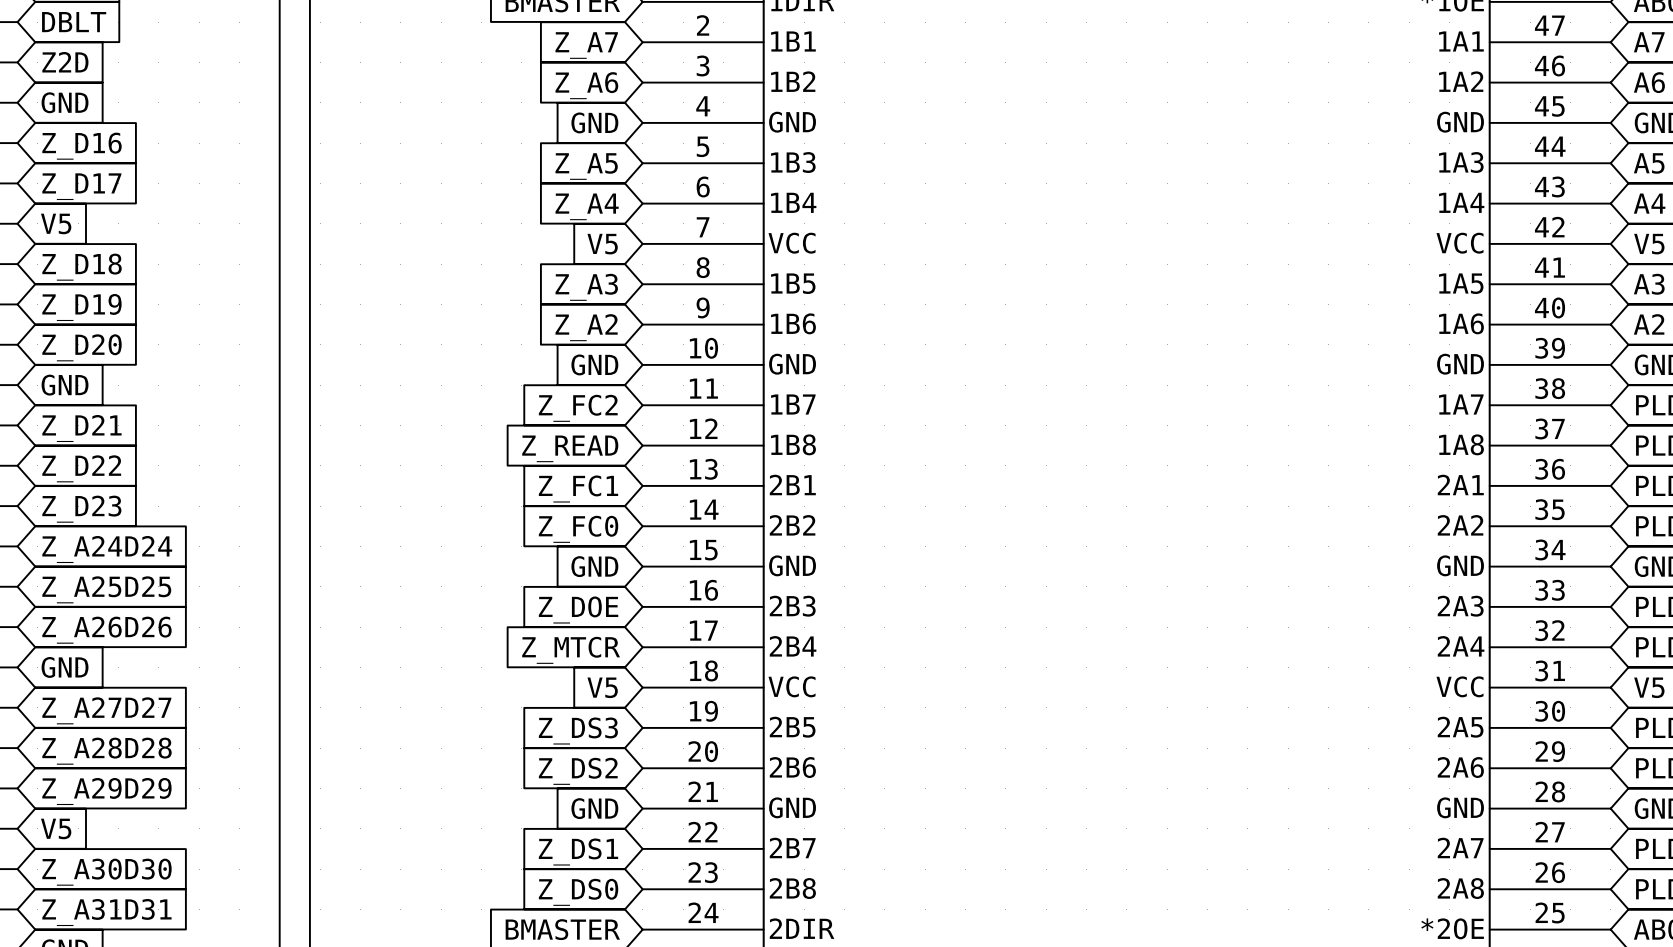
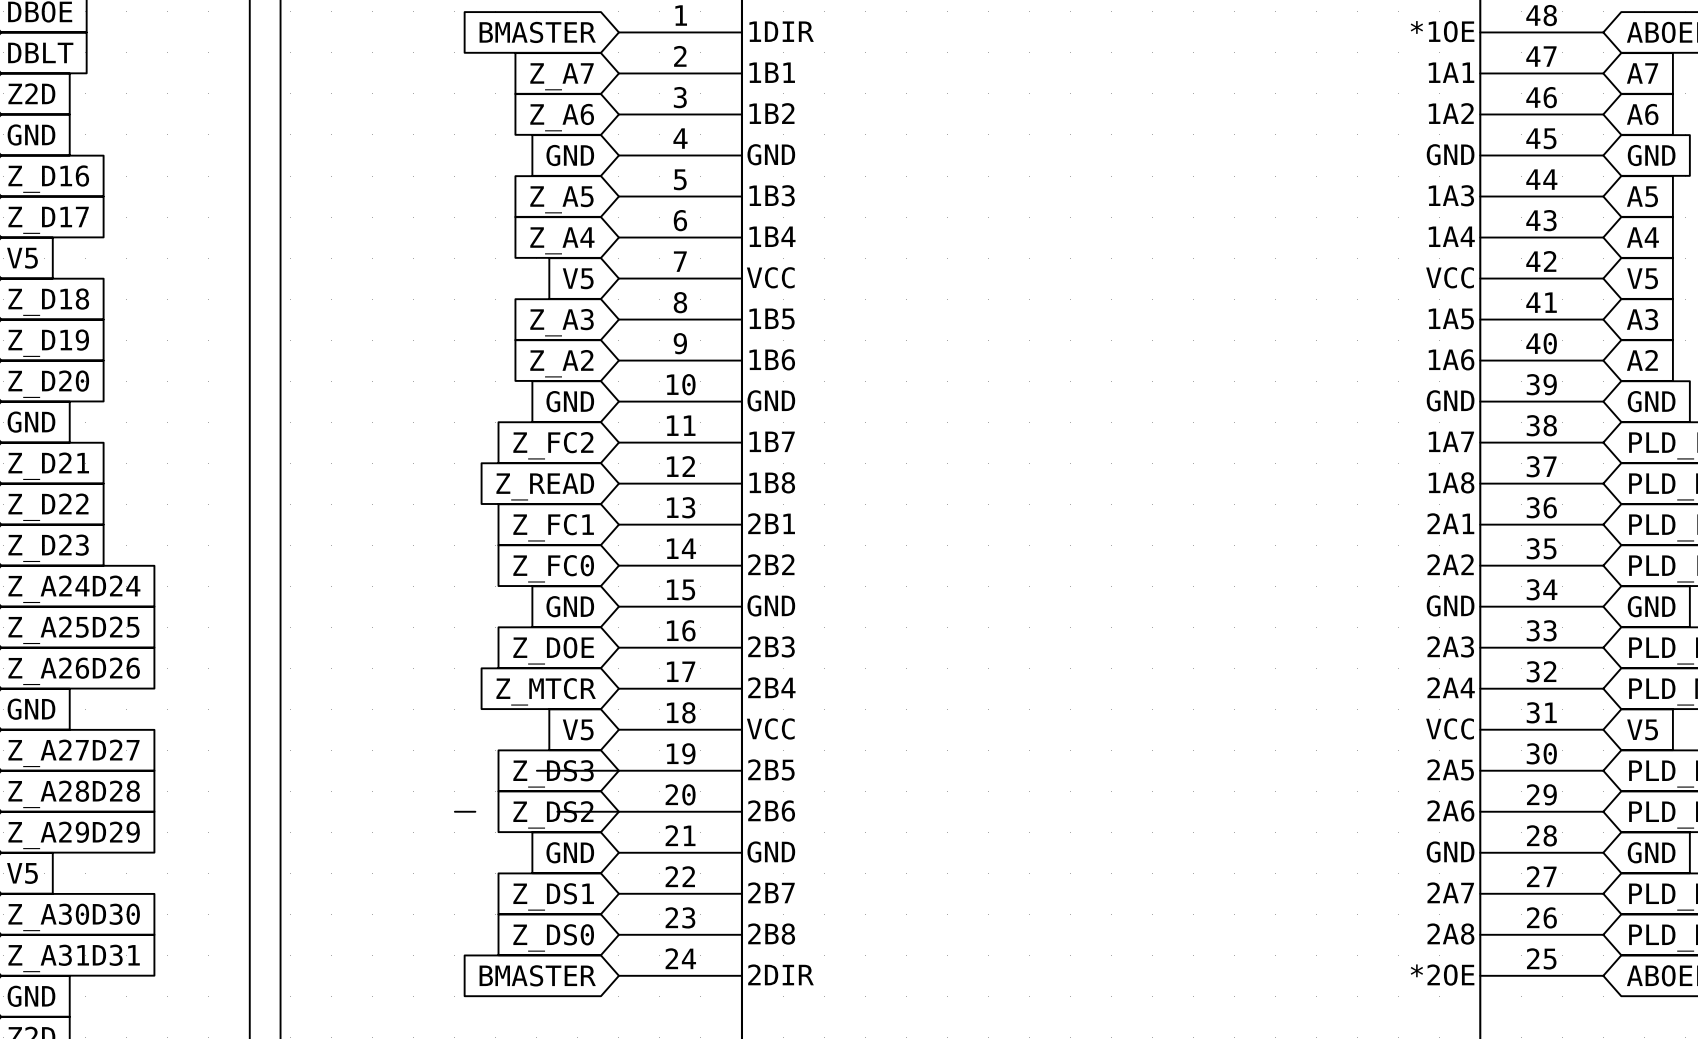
wire: none -> (536, 770) (618, 770)
wire: none -> (454, 811) (475, 811)
wire: none -> (557, 811) (618, 811)

